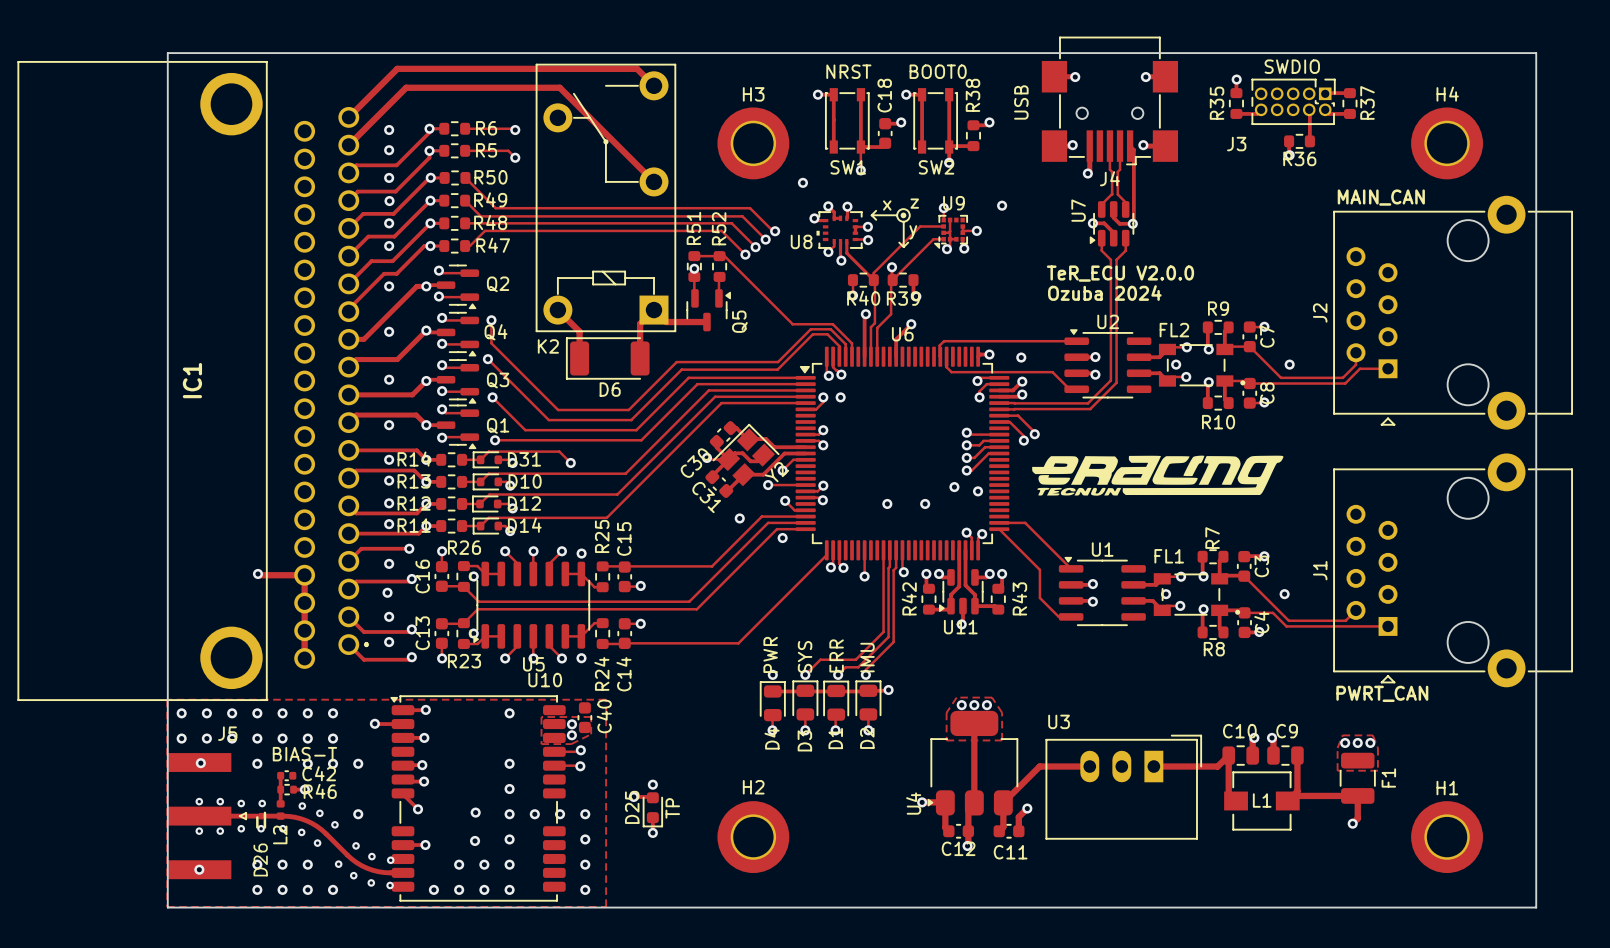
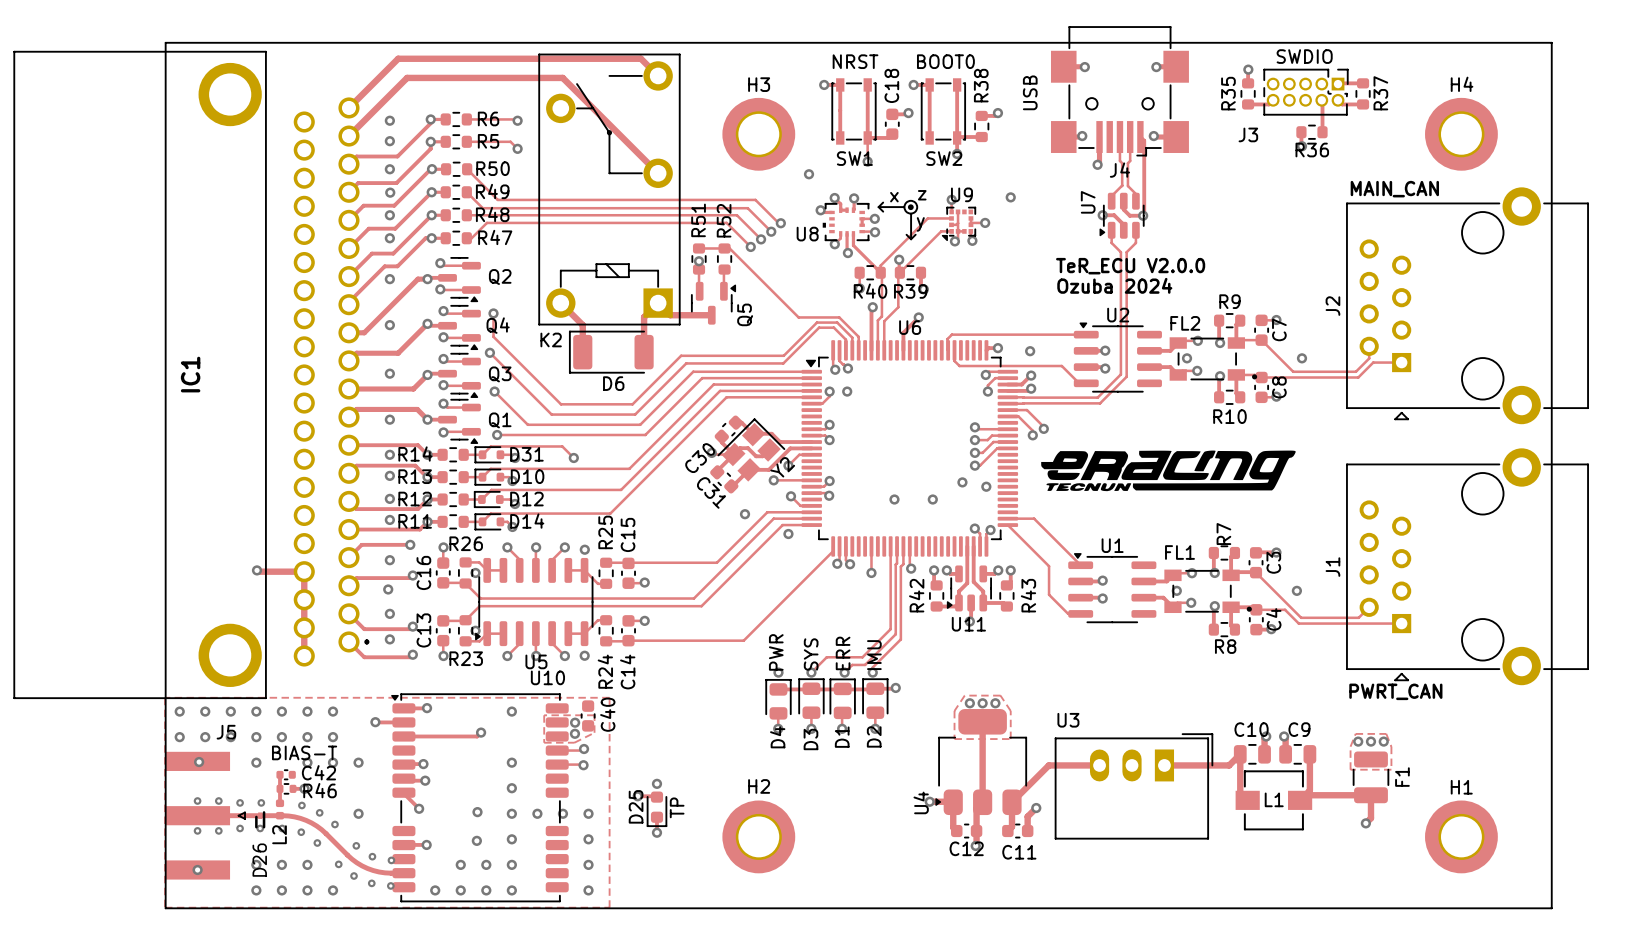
track: none -> (481, 732) (477, 736) (425, 736)
via position: (424, 737) -> (481, 732)

